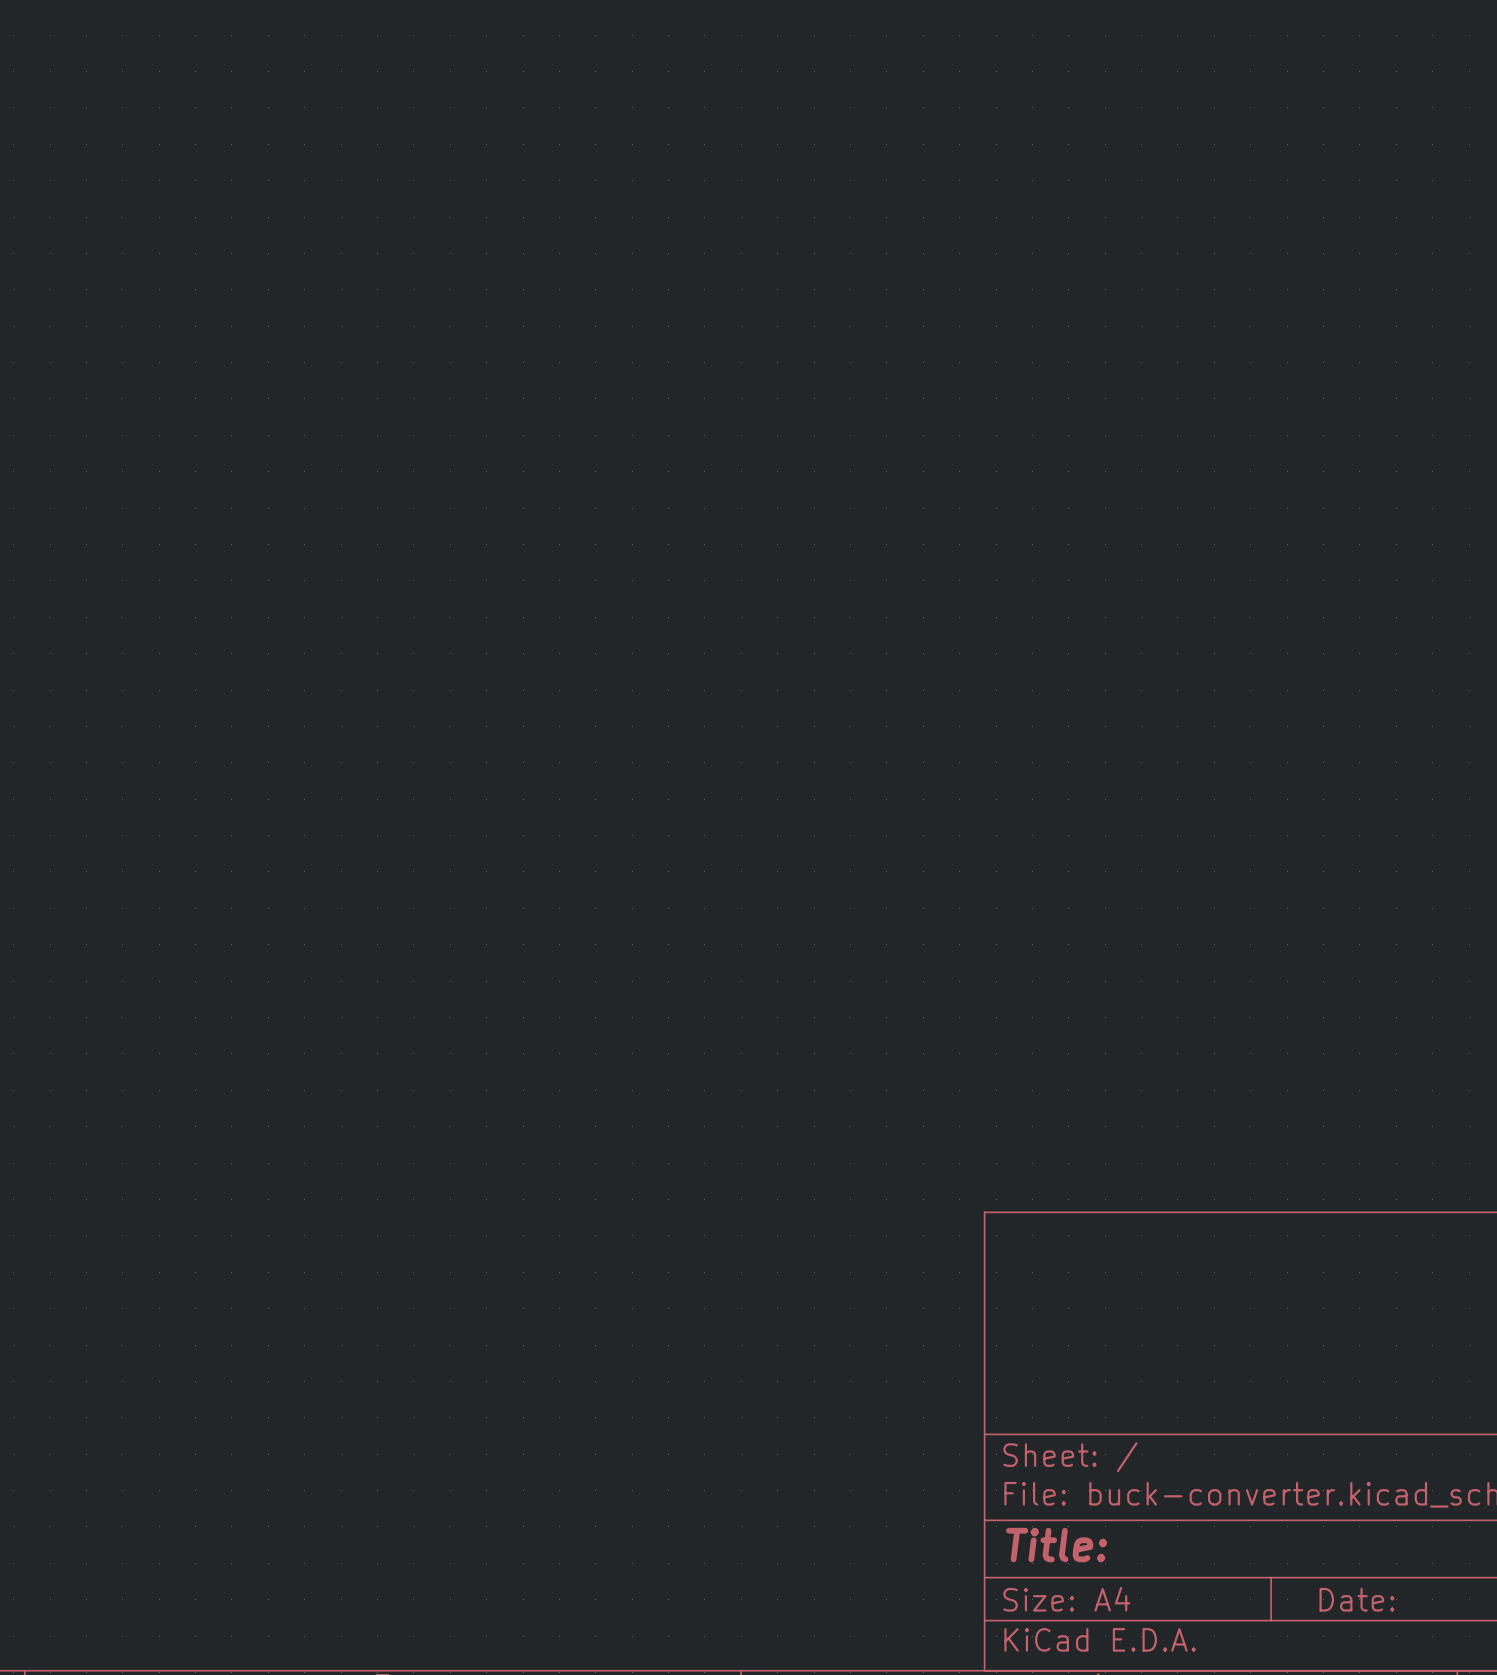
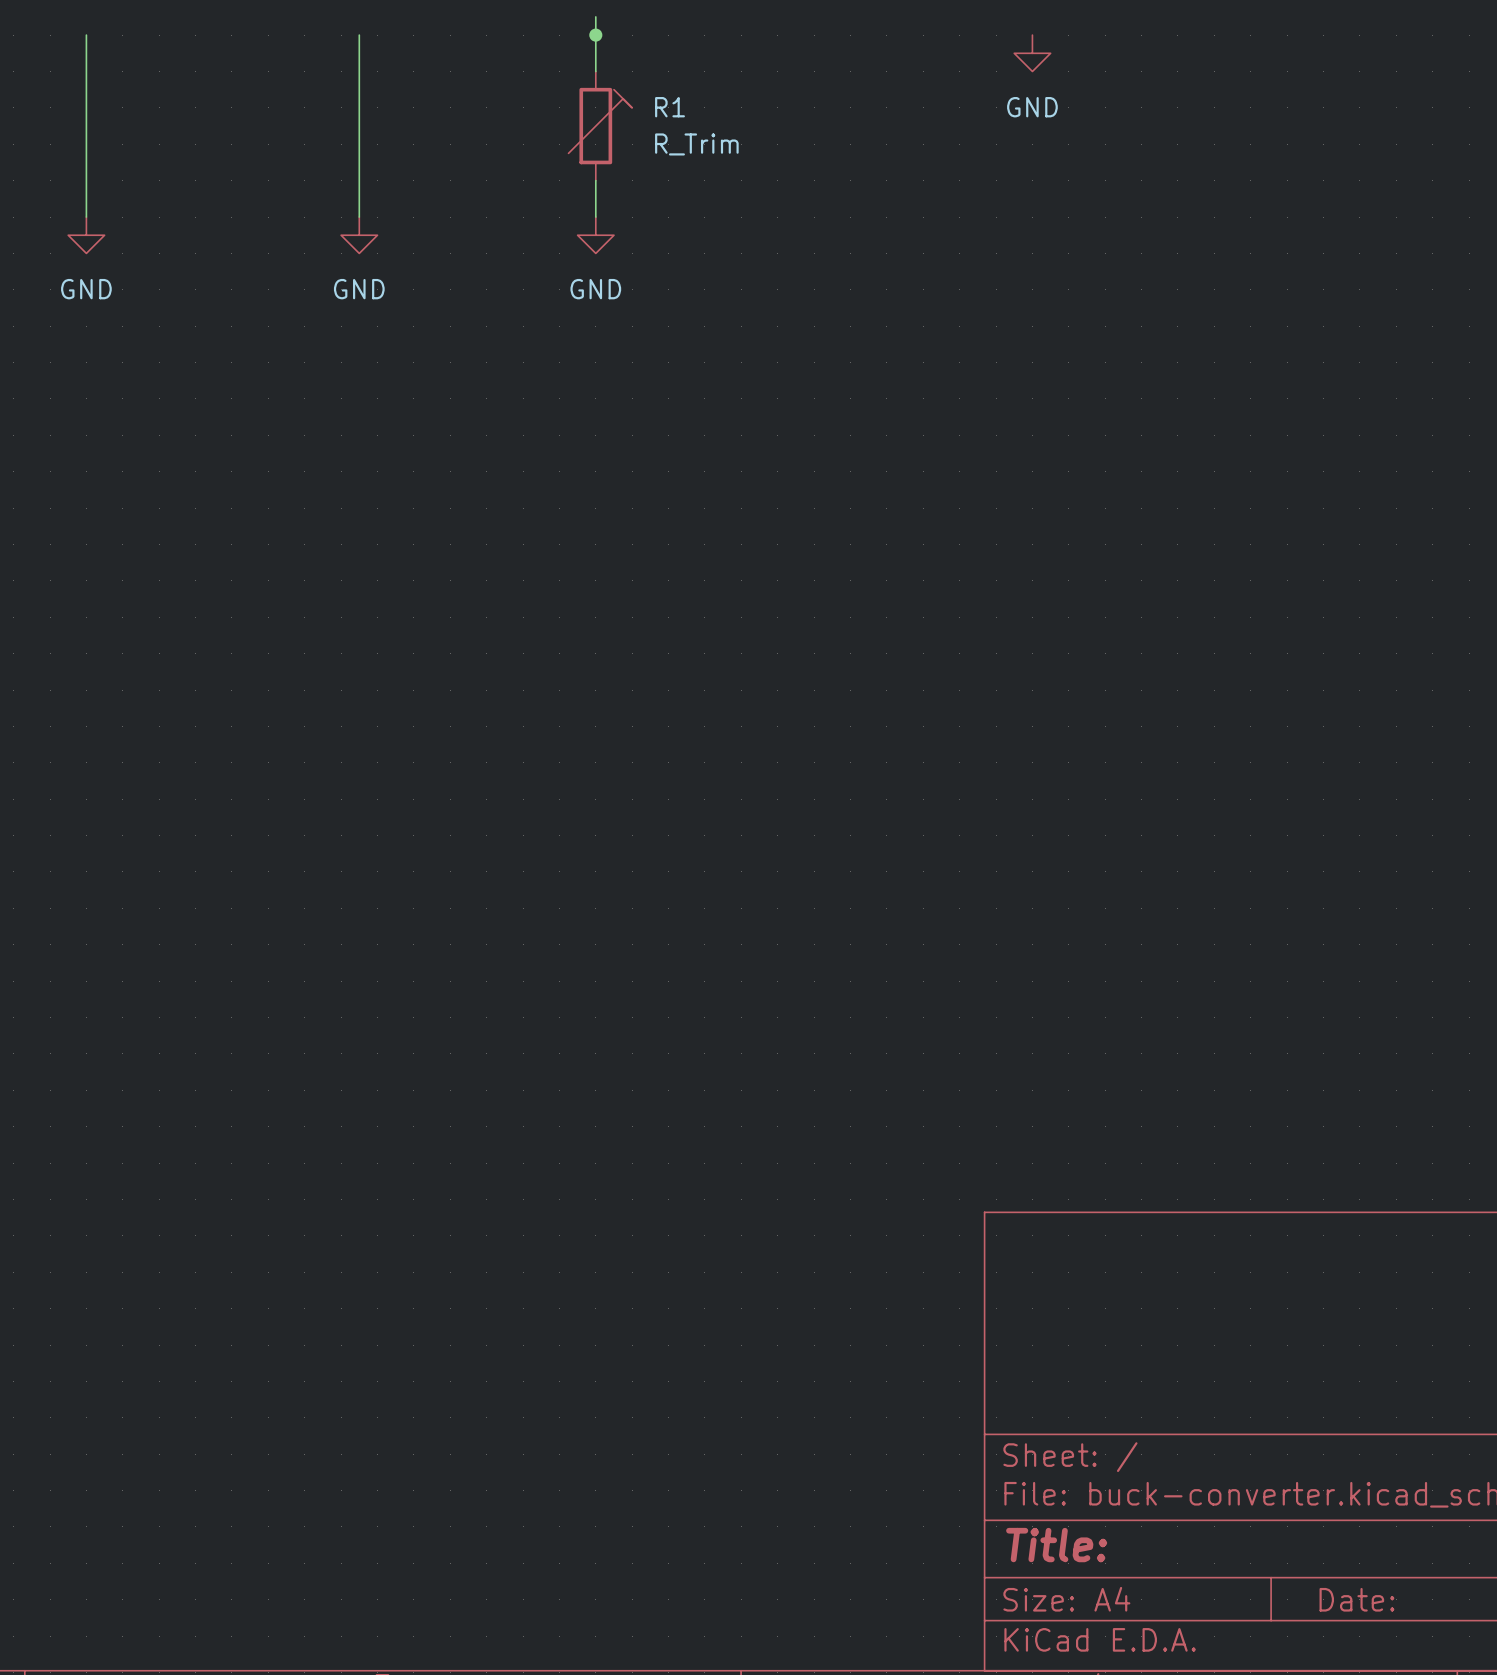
wire: none -> (595, 16) (595, 71)
wire: none -> (86, 35) (86, 217)
wire: none -> (359, 35) (359, 217)
junction: none -> (595, 35)
power symbol: none -> GND (1032, 53)
R1: none -> R_Trim (600, 126)
wire: none -> (595, 180) (595, 217)
power symbol: none -> GND (86, 235)
power symbol: none -> GND (359, 235)
power symbol: none -> GND (595, 235)

